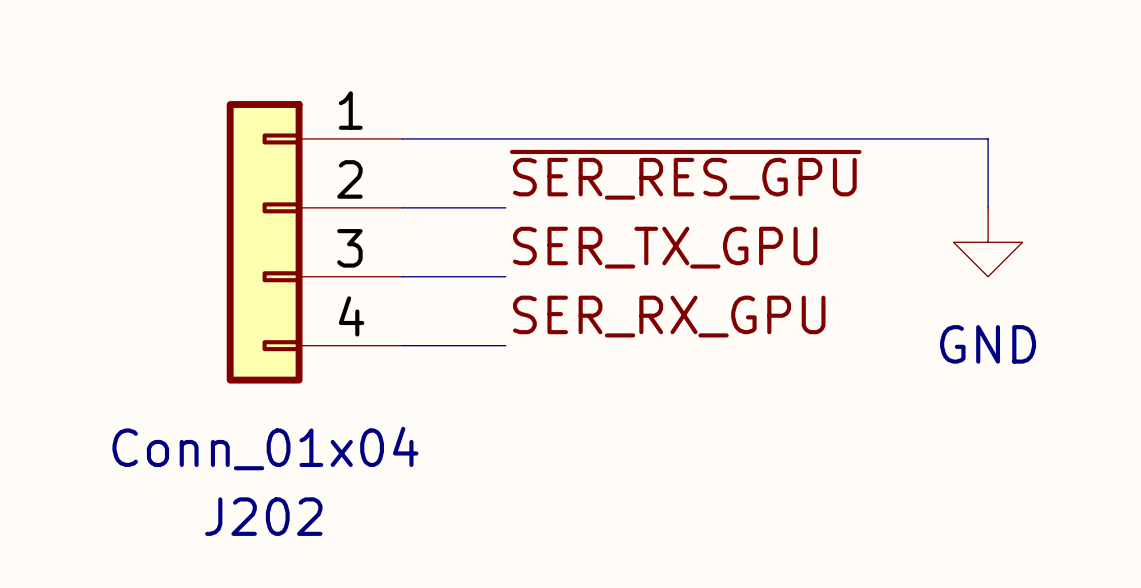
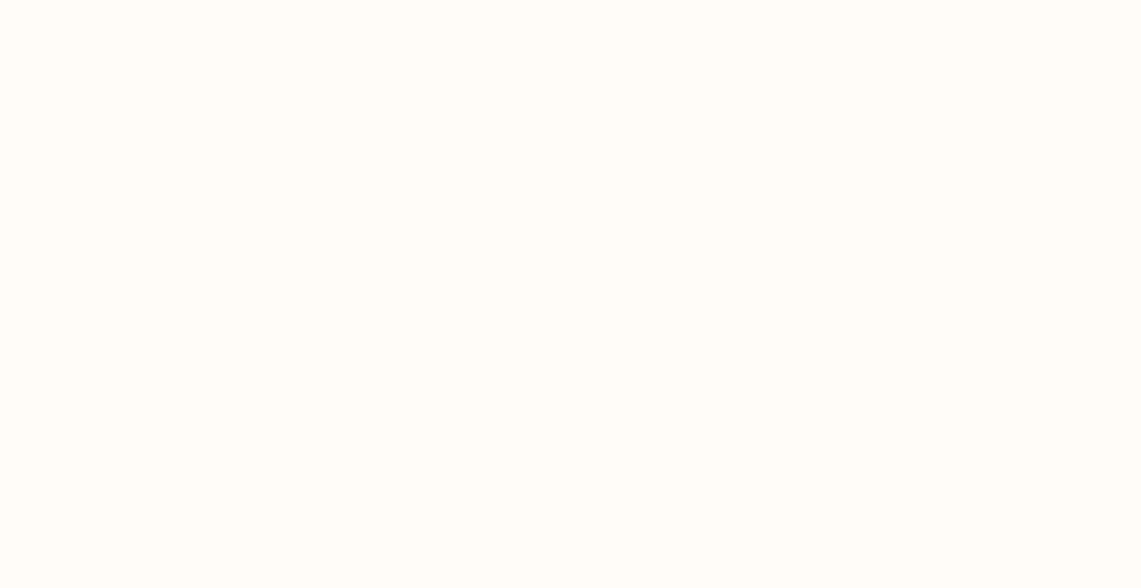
wire: (402, 138) (988, 138) (988, 207) -> none
label: ~{SER_RES_GPU} (685, 174) -> none
wire: (402, 207) (505, 207) -> none
J202: Conn_01x04 (314, 242) -> none
power symbol: GND (988, 242) -> none
label: SER_TX_GPU (665, 247) -> none
wire: (402, 276) (505, 276) -> none
label: SER_RX_GPU (669, 316) -> none
wire: (402, 345) (505, 345) -> none

